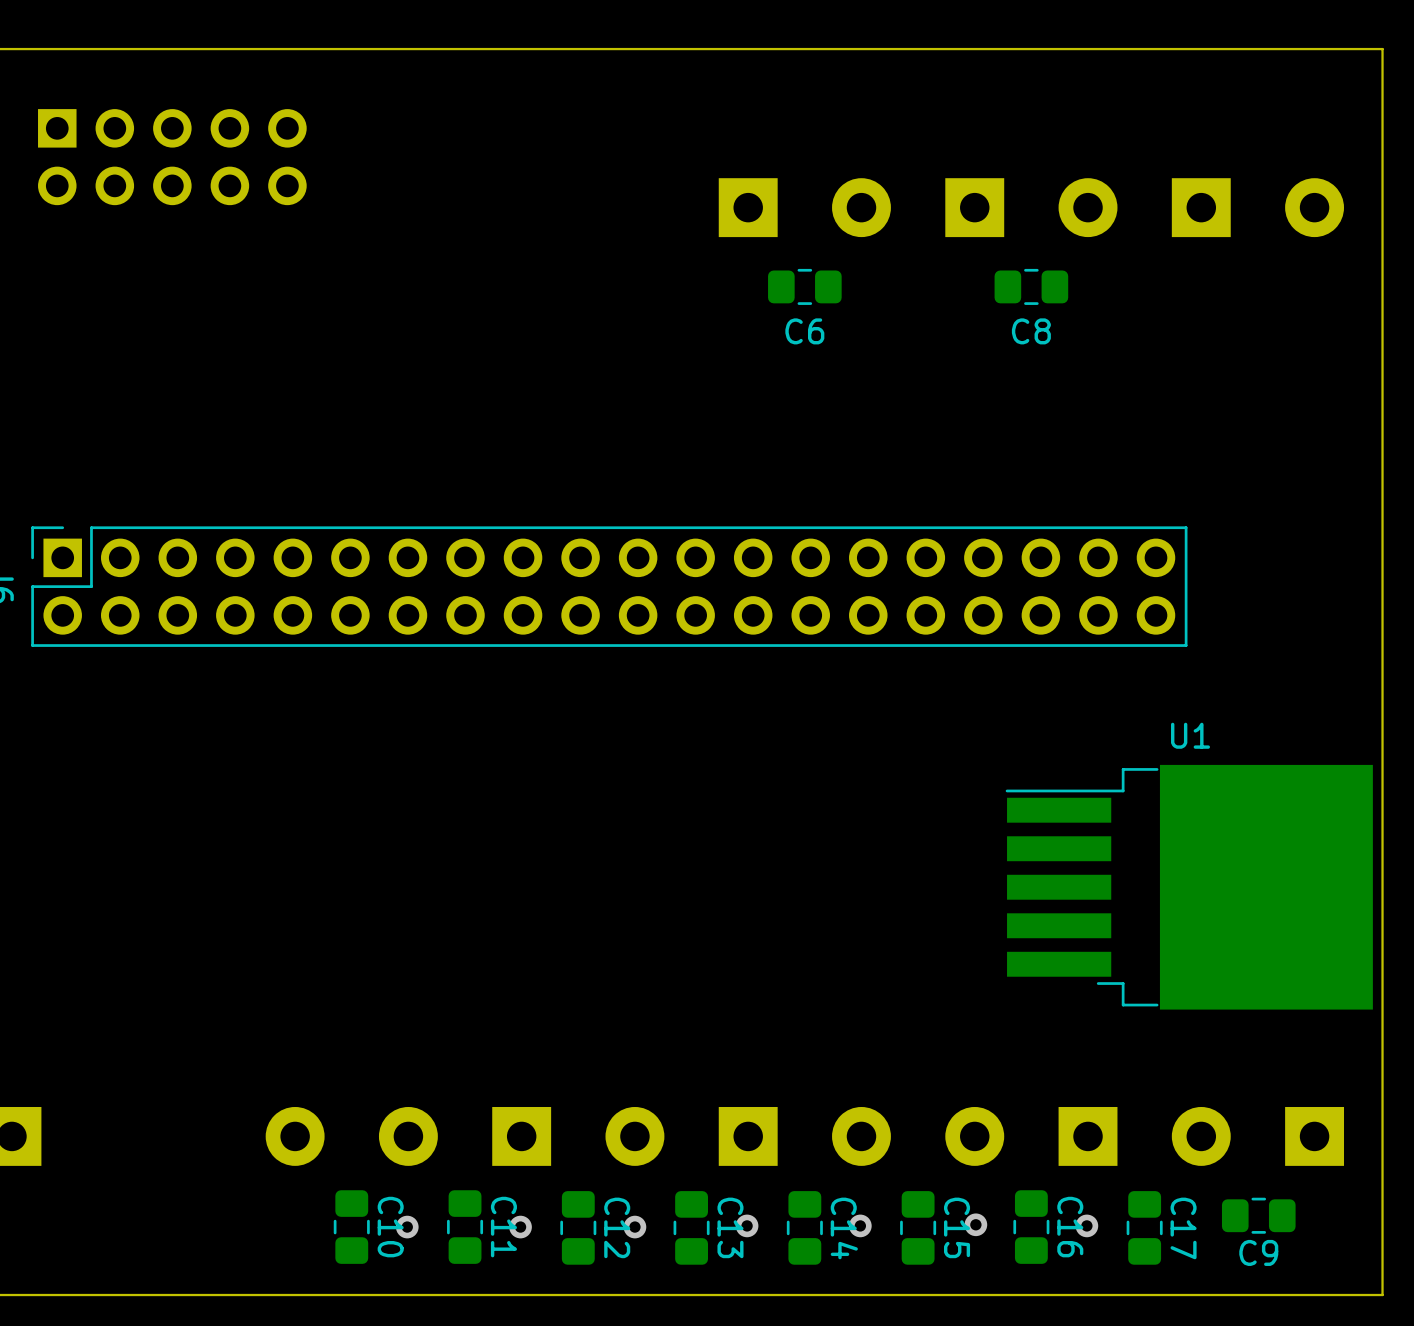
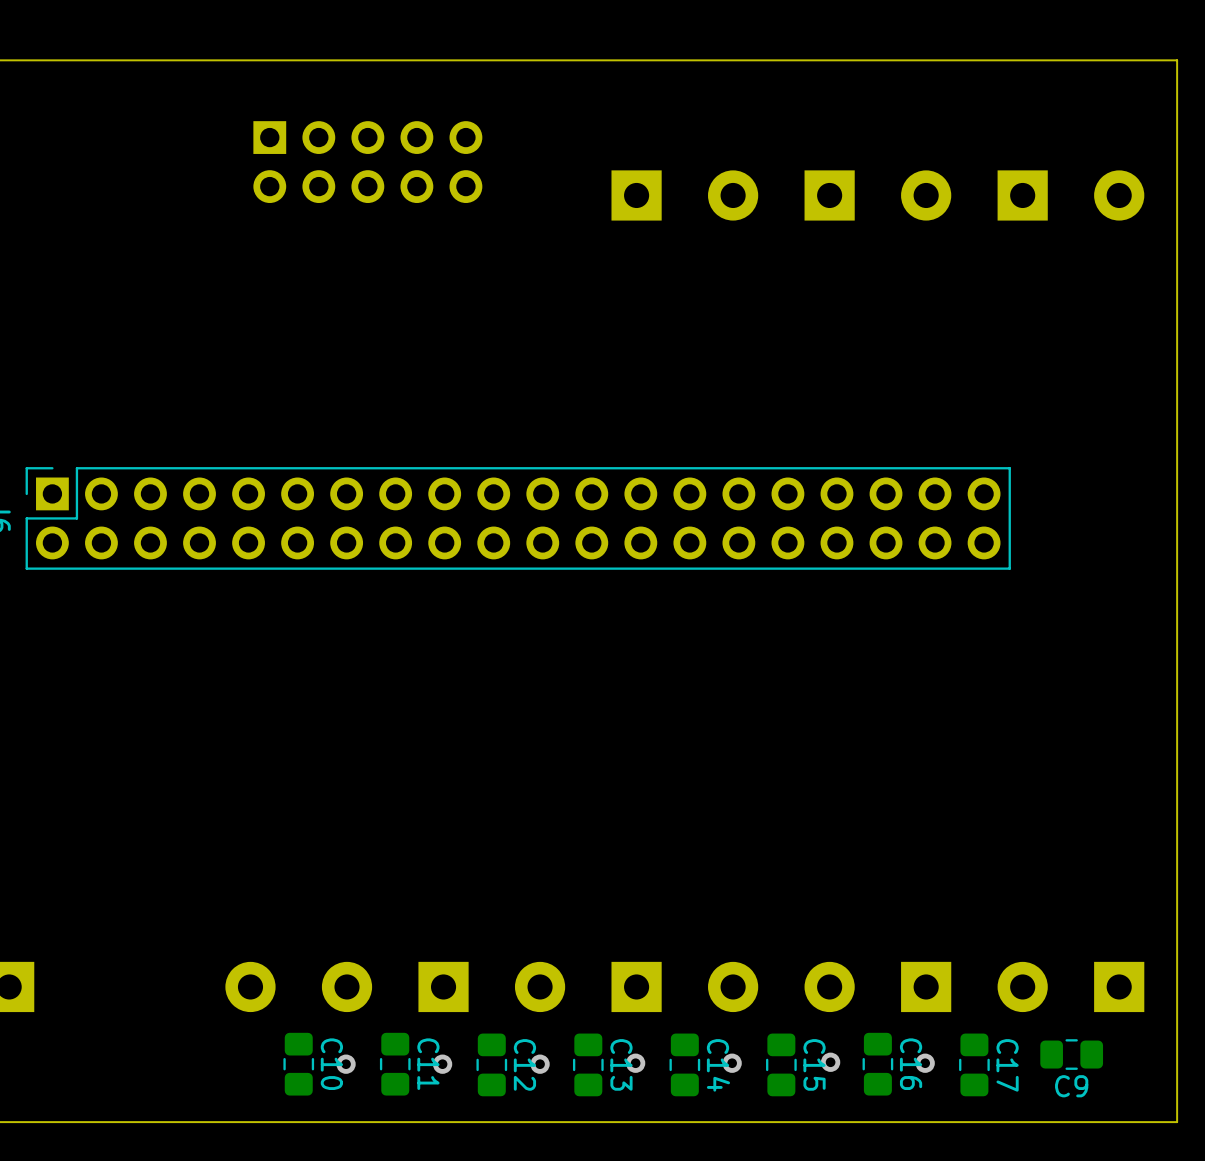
part position: (172, 157) -> (367, 162)
C6: (804, 286) -> none
C8: (1031, 286) -> none
U1: (1189, 887) -> none

